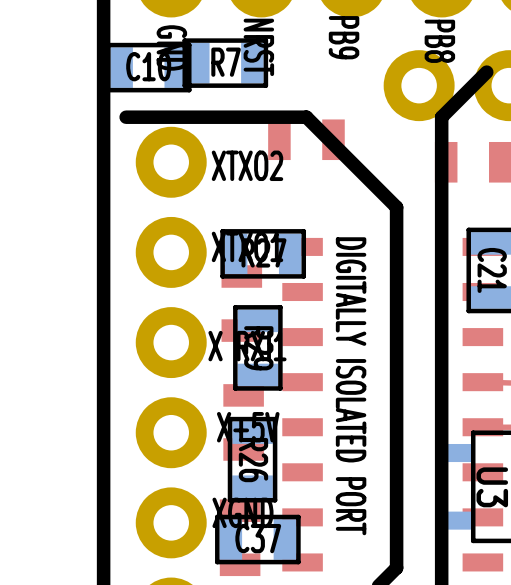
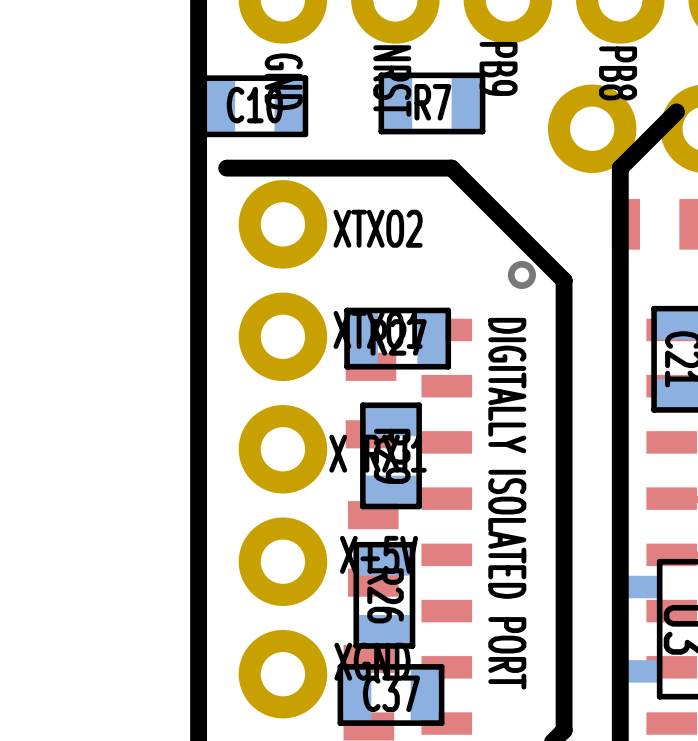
R7 position: (225, 63) -> (431, 103)
part: (306, 139) -> none
via: none -> (521, 274)

